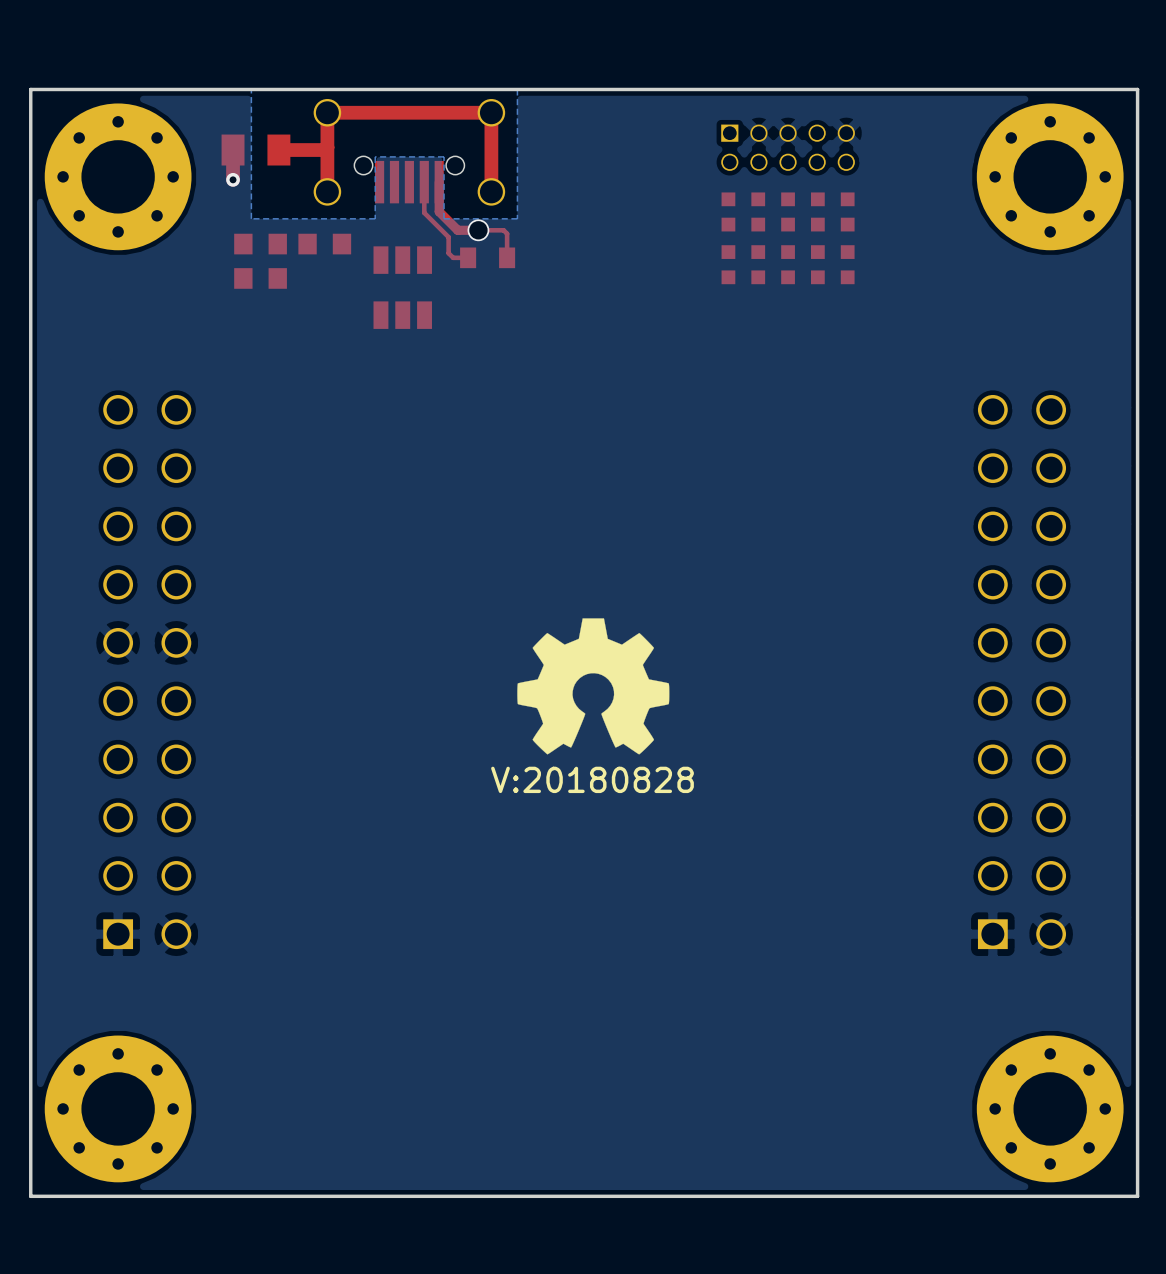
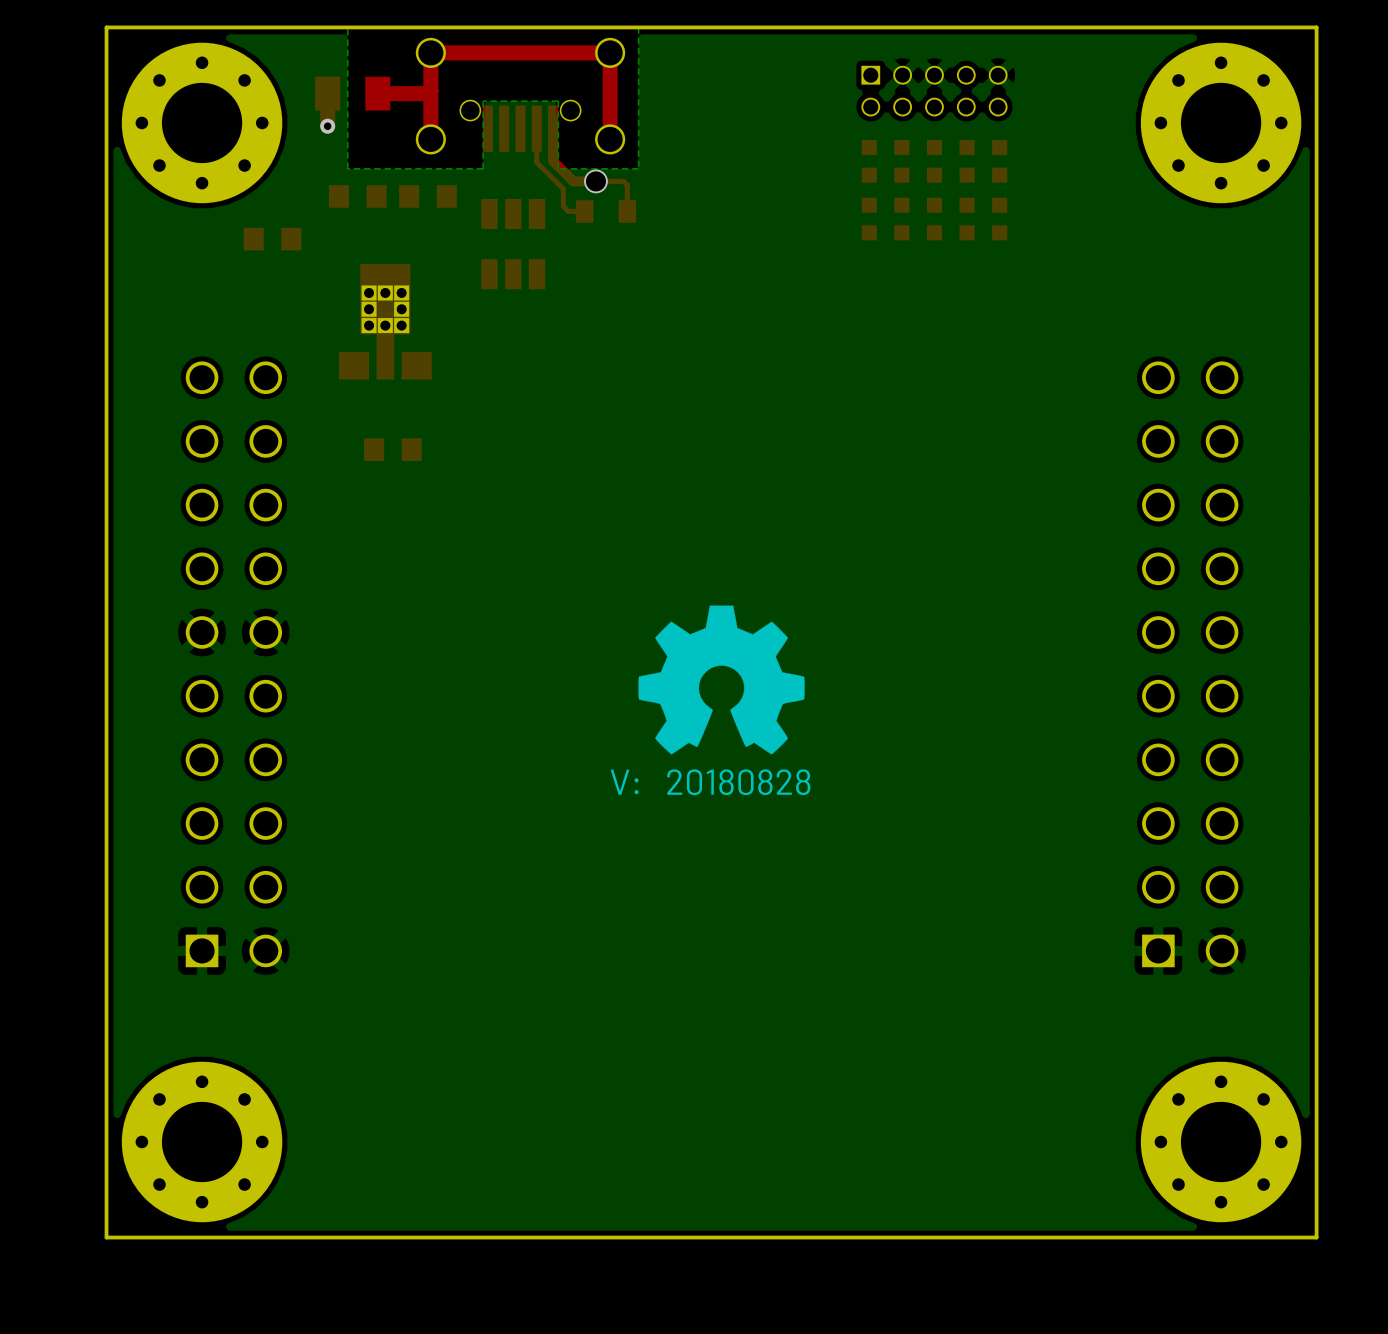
part position: (260, 278) -> (272, 239)
part: none -> (385, 321)
part: none -> (392, 449)

